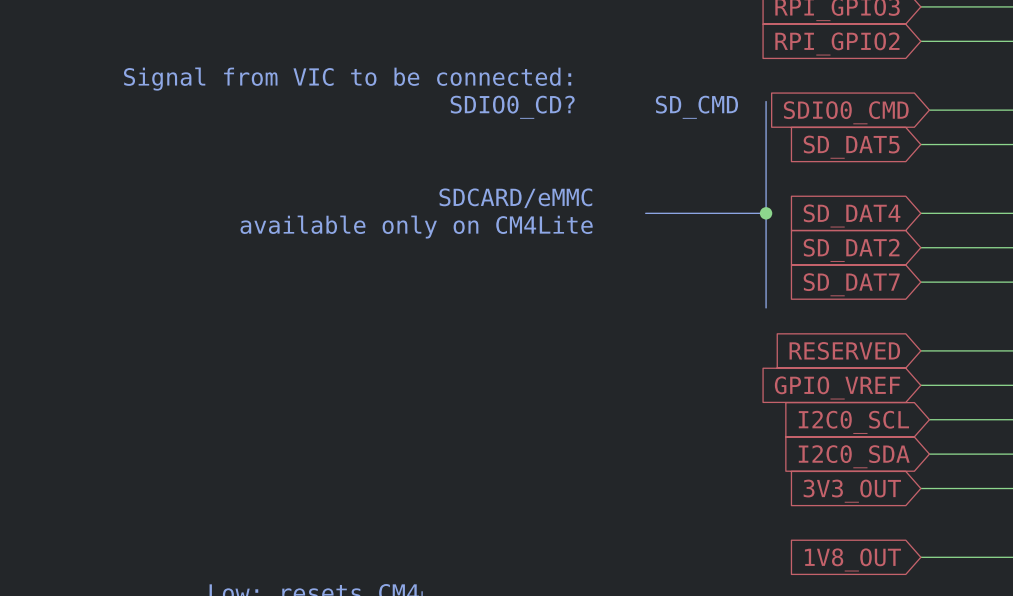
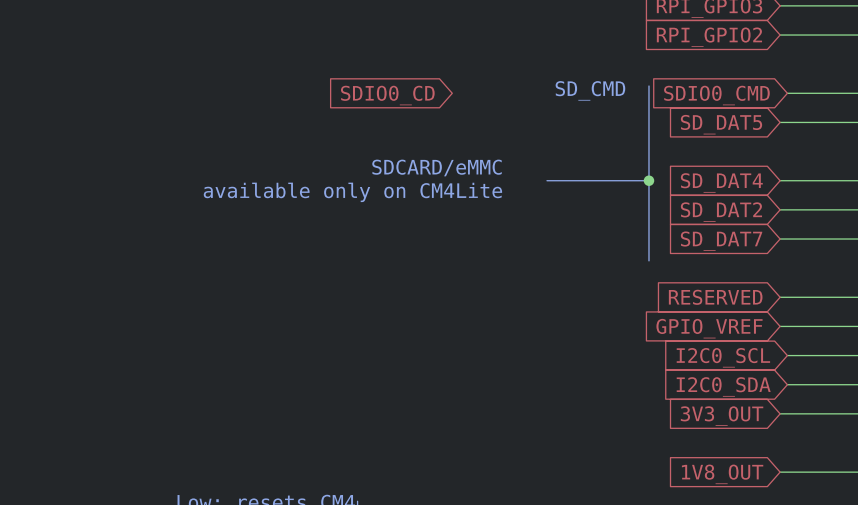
text: Signal from VIC to be connected: (347, 79) -> none
text: SDIO0_CD? (512, 107) -> none
global label: none -> SDIO0_CD (387, 95)

